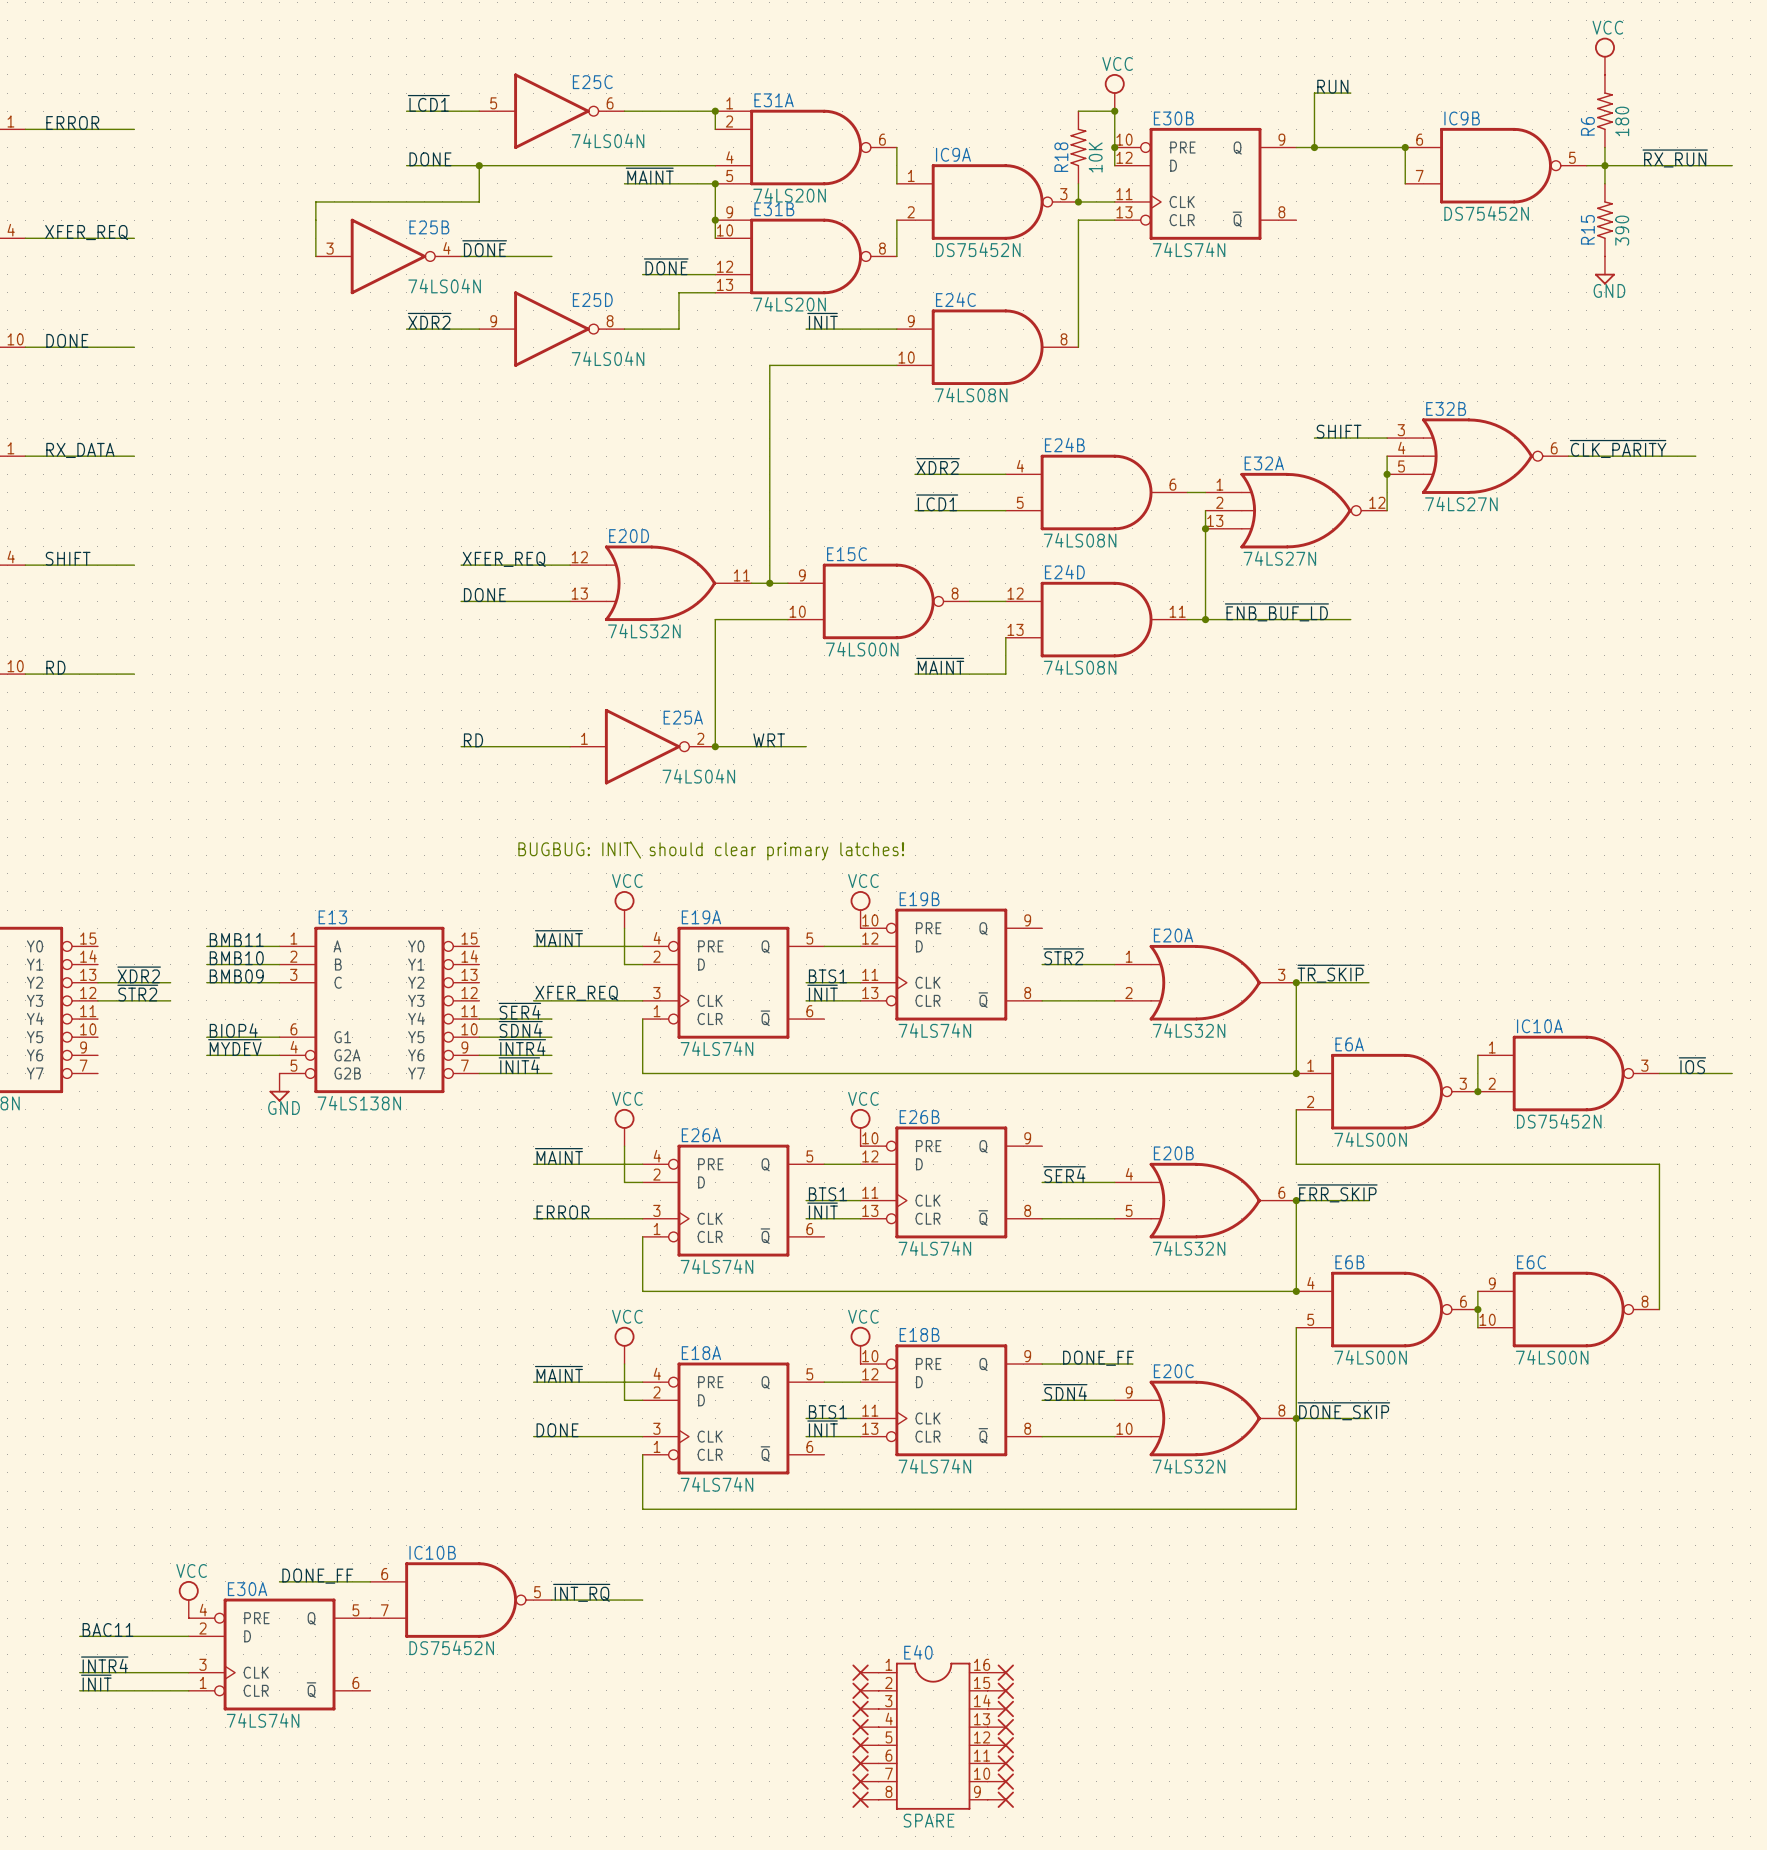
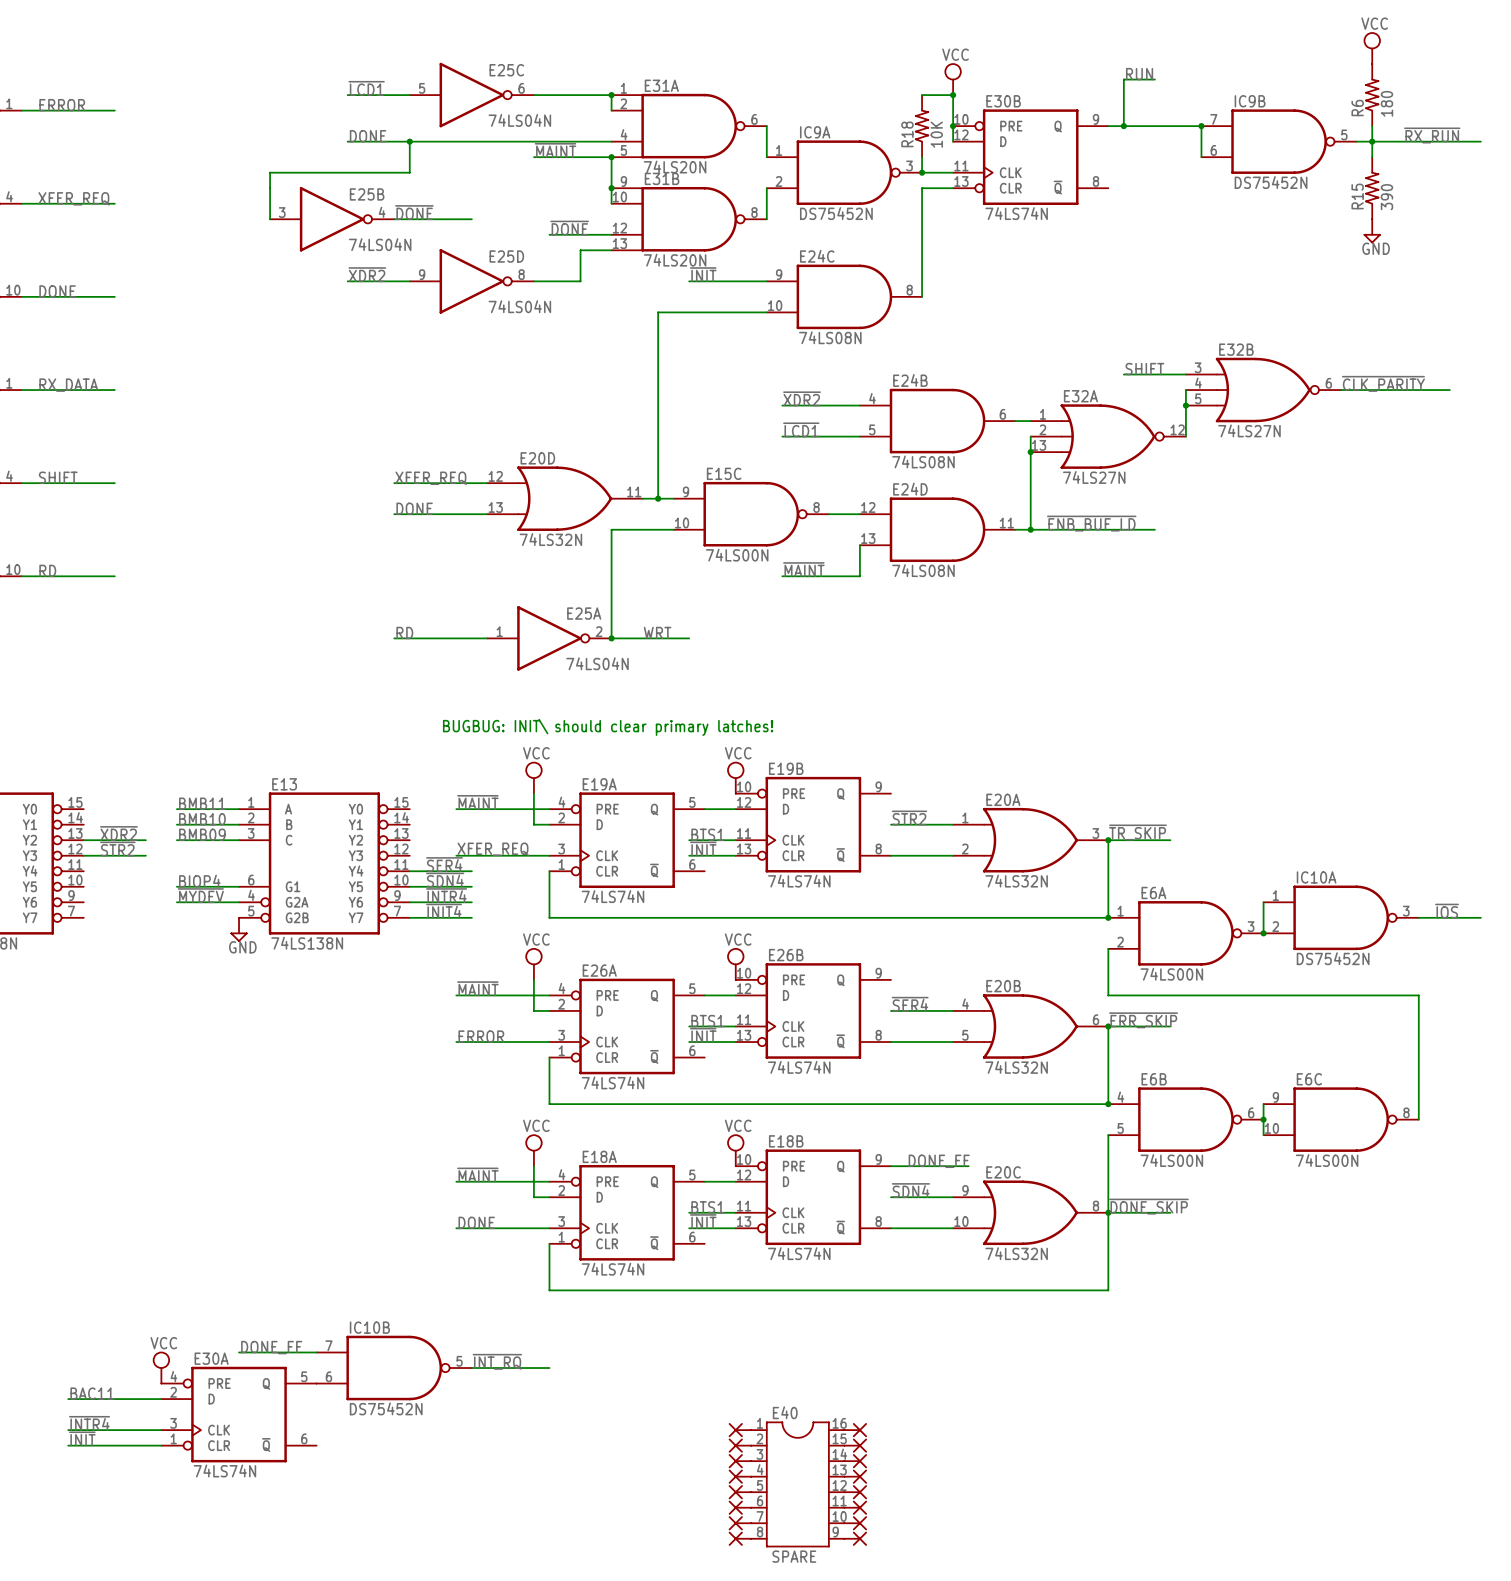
IC9B flip: as is (1496, 165) -> up-down (1279, 141)
IC10B flip: as is (461, 1600) -> up-down (394, 1368)

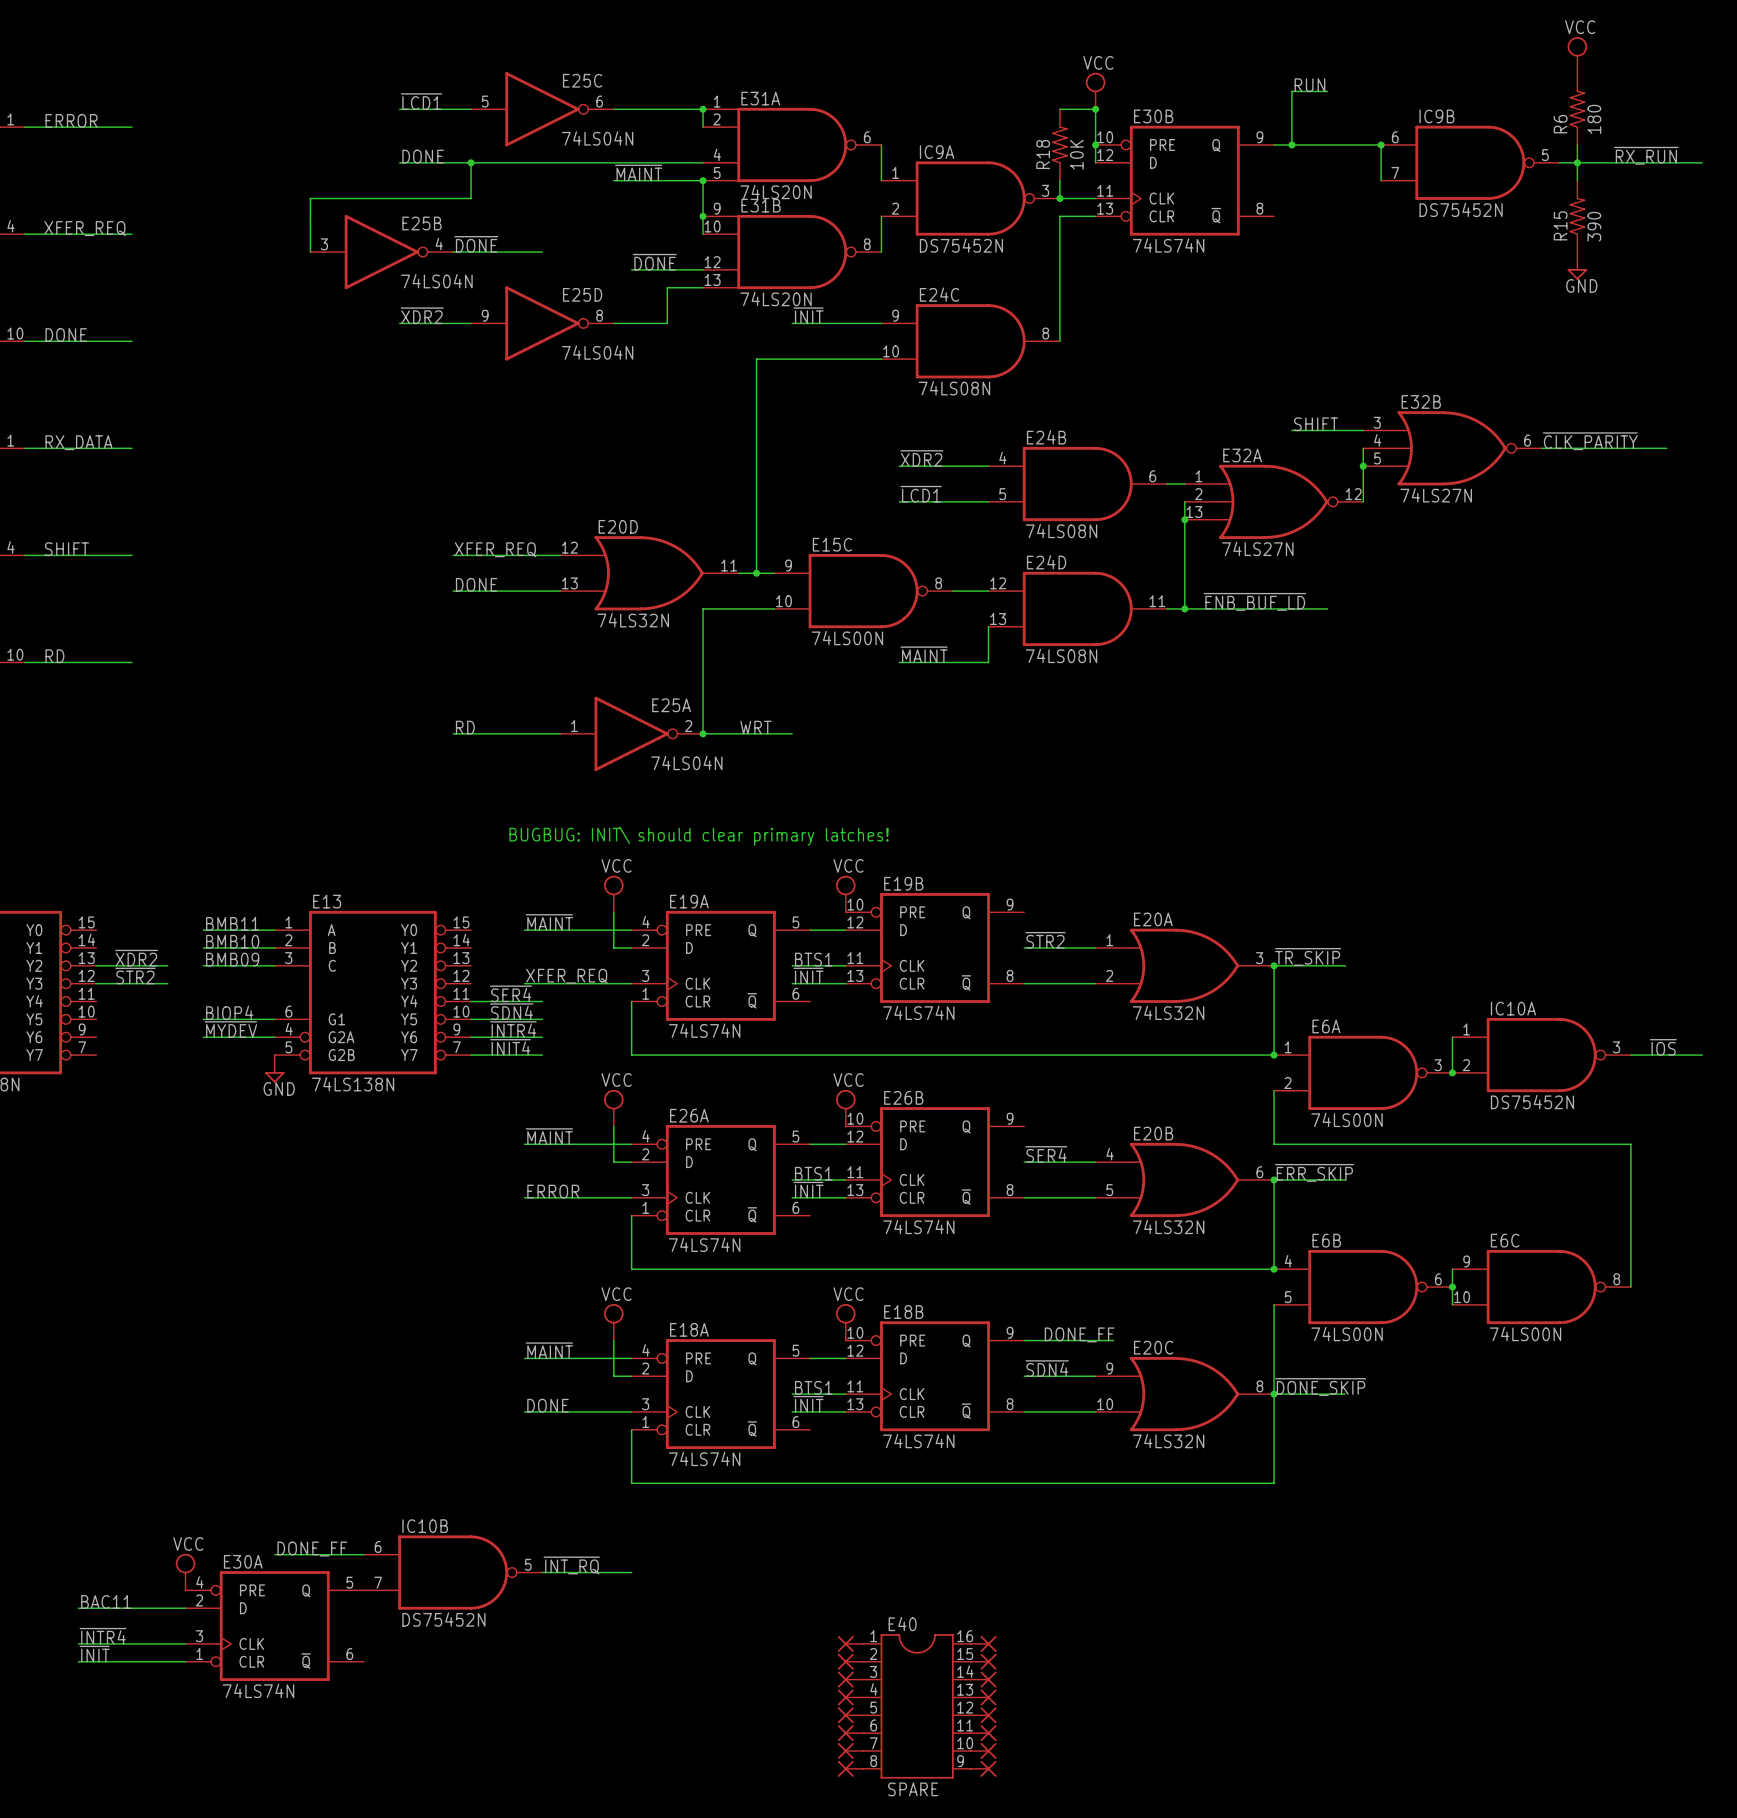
IC9B flip: as is (1279, 141) -> up-down (1470, 162)
IC10B flip: as is (394, 1368) -> up-down (453, 1572)

